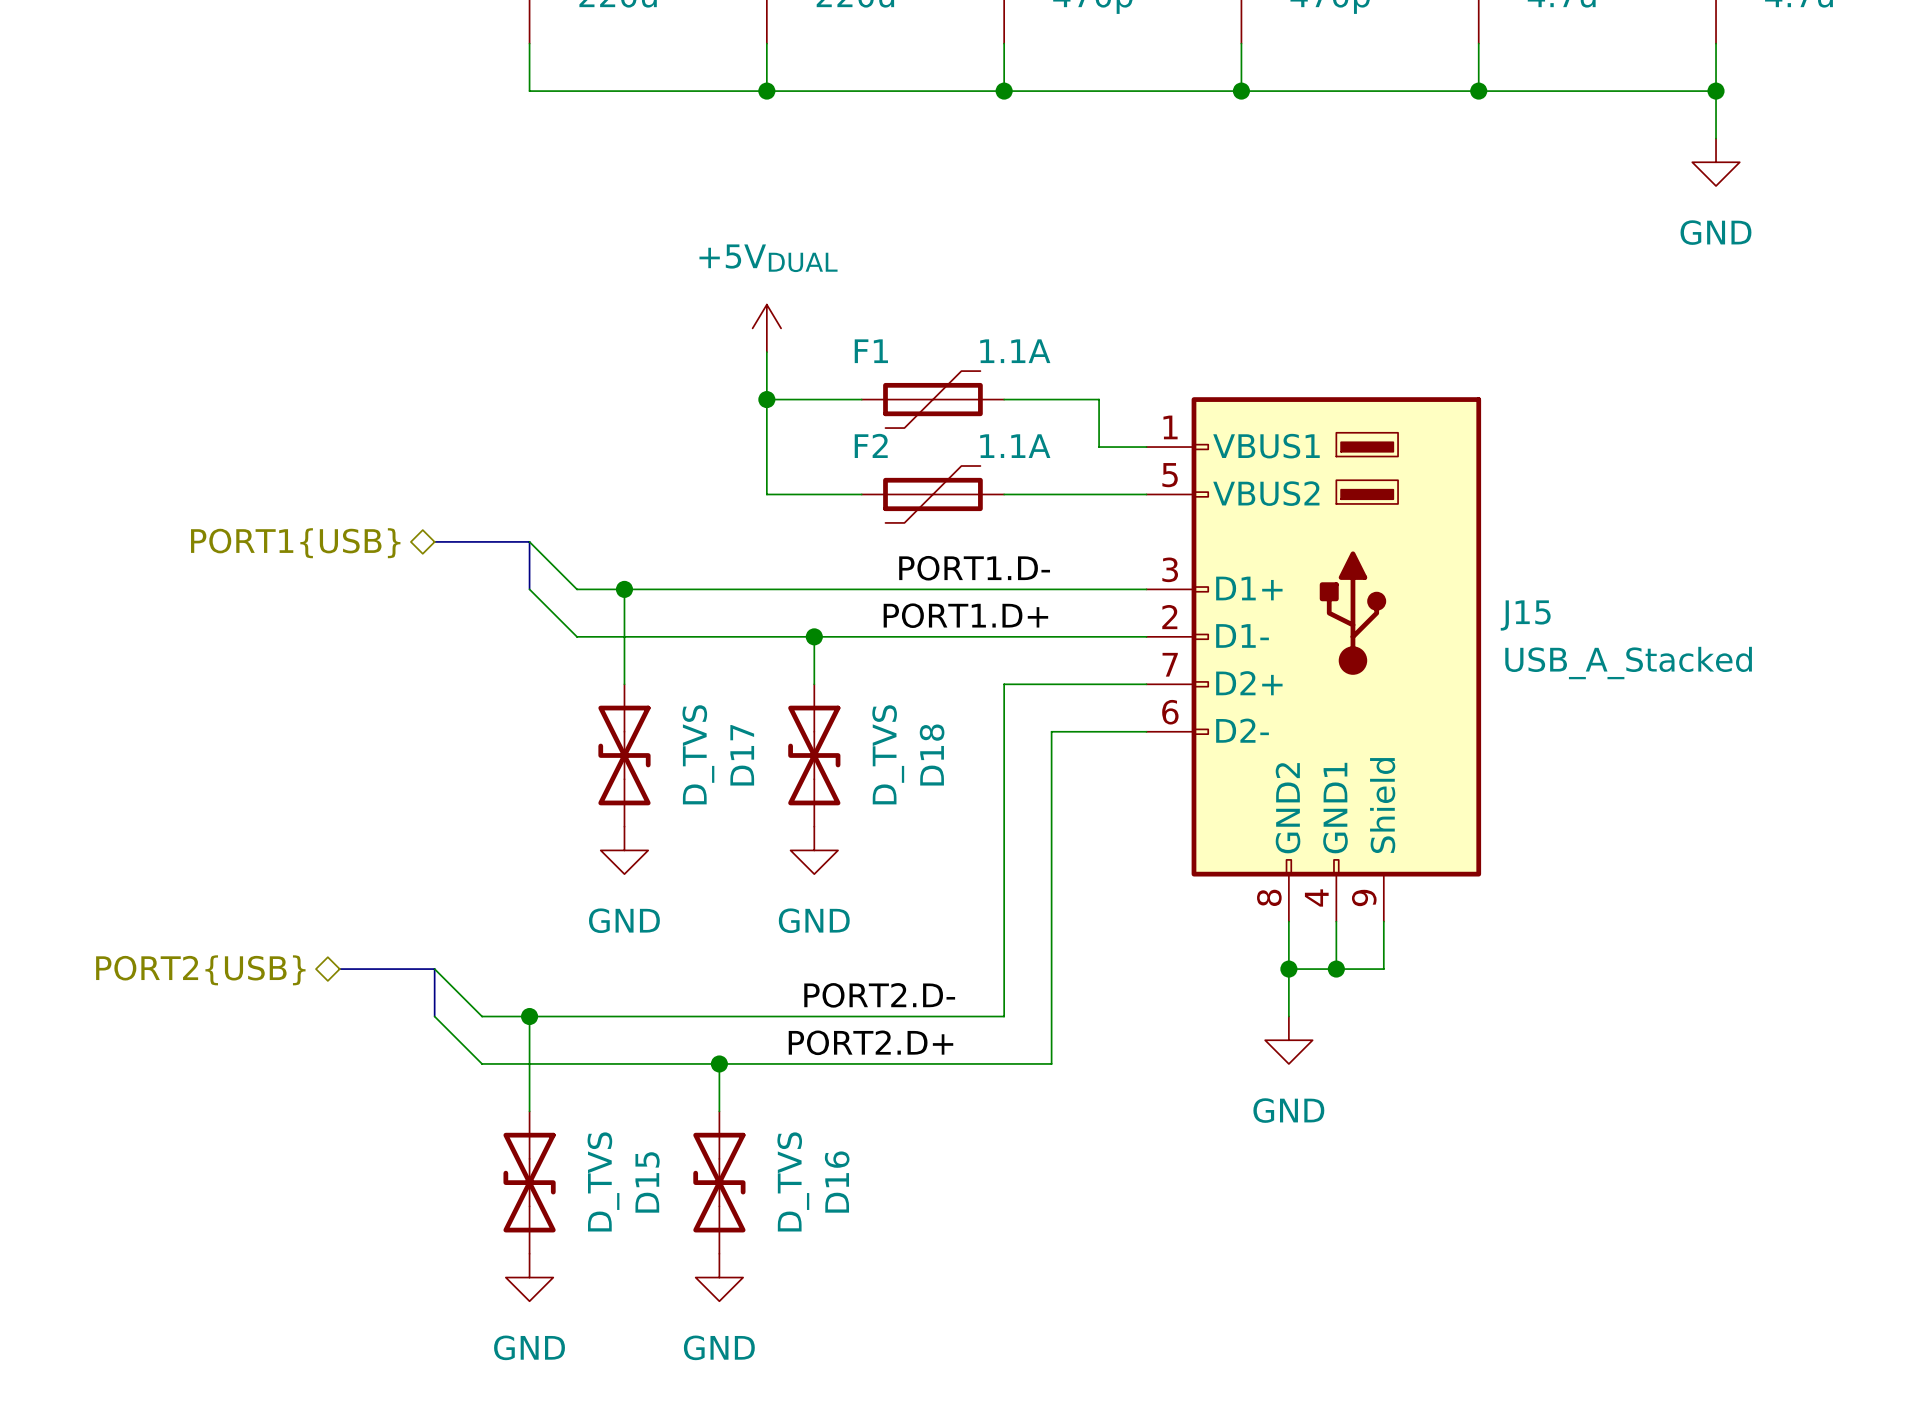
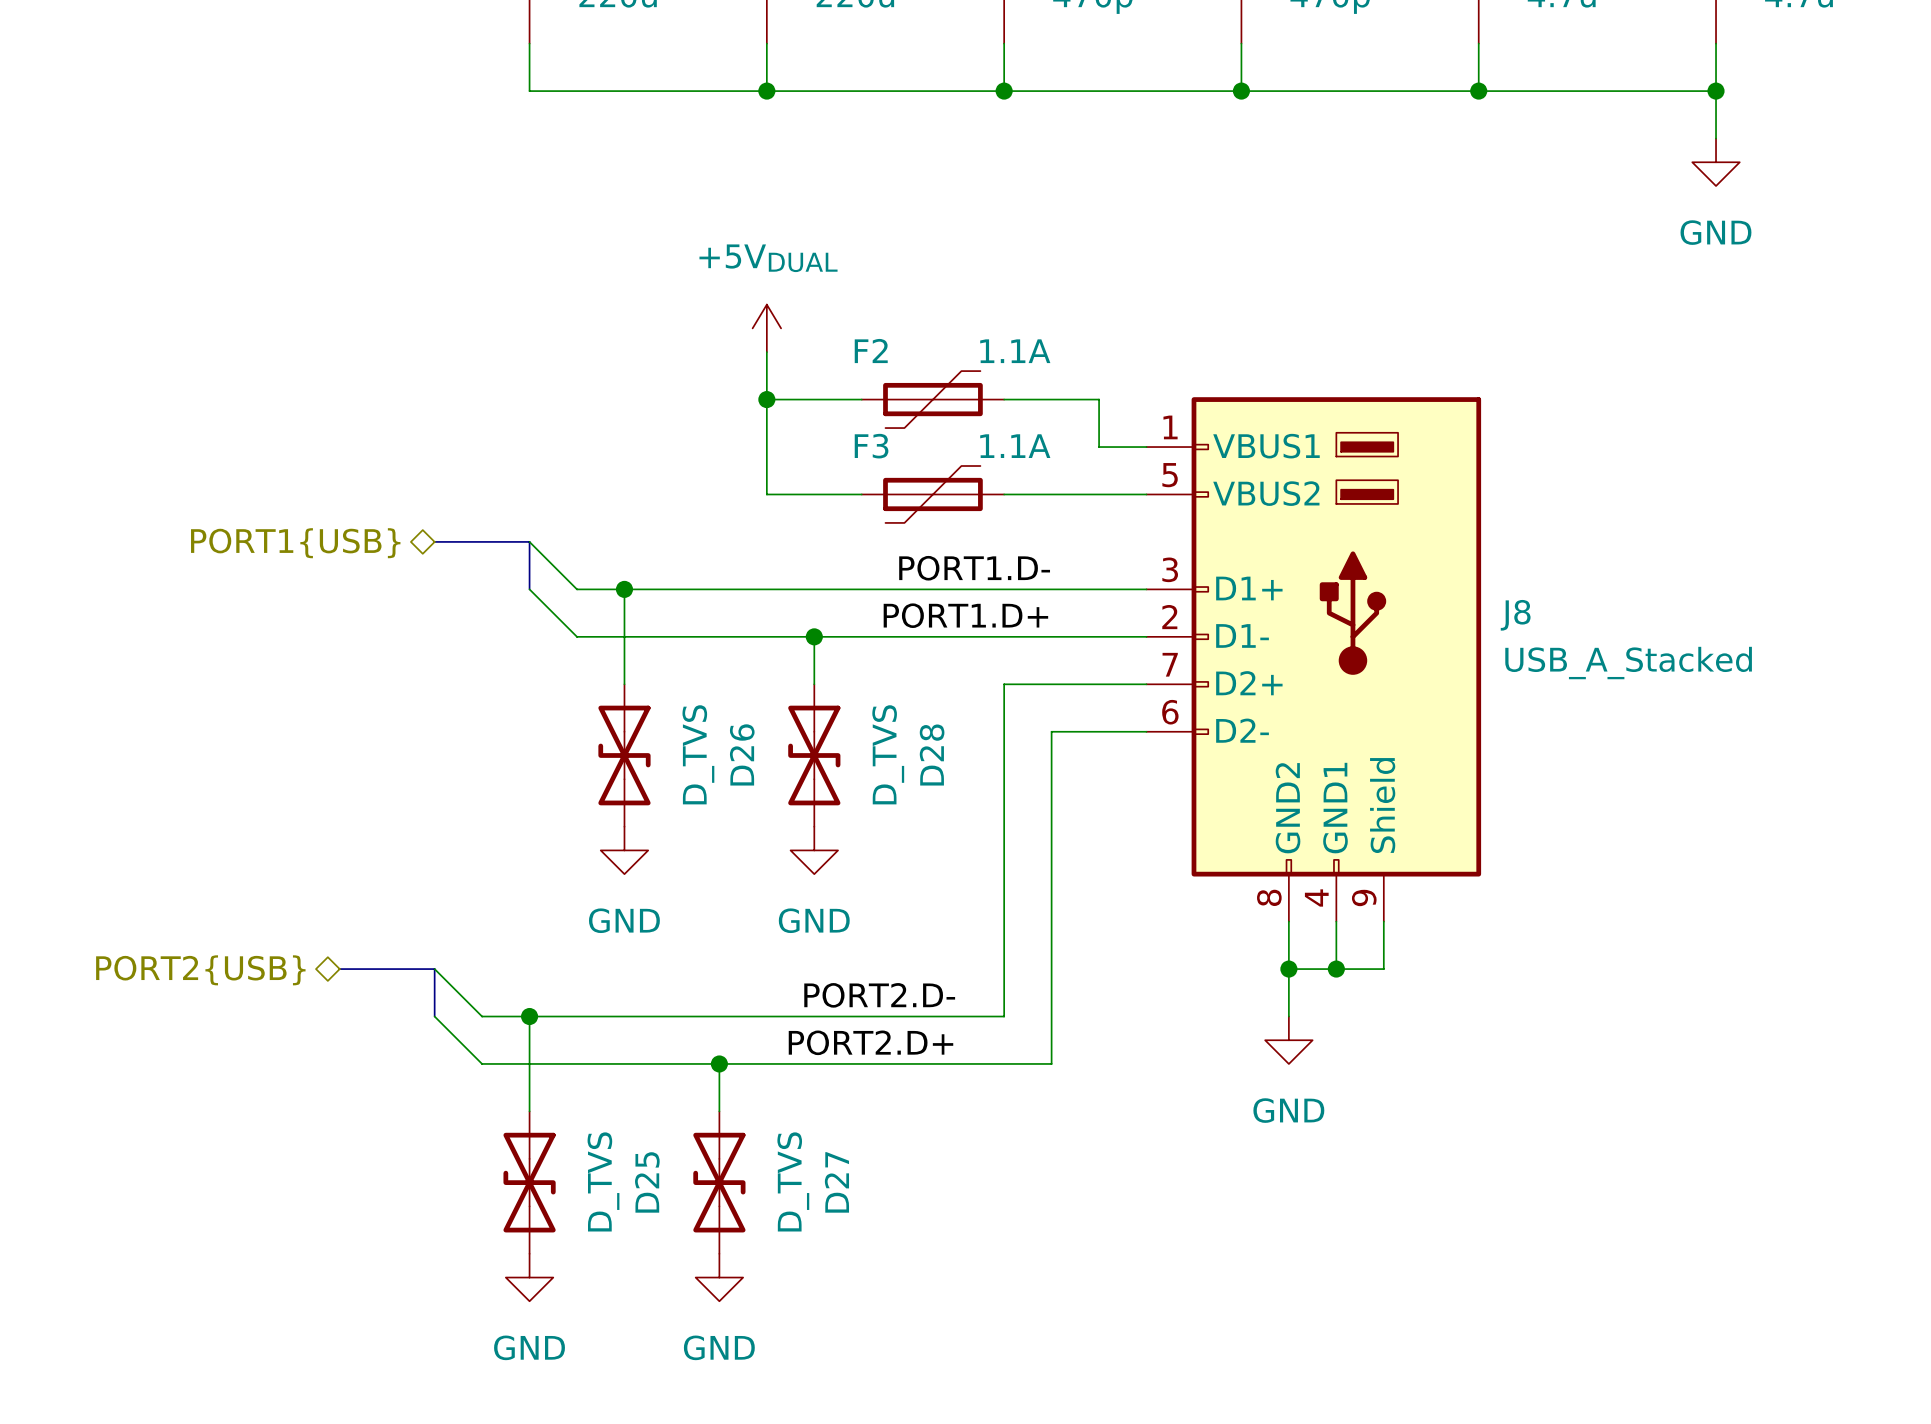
F1 name: F1 (871, 351) -> F2 (871, 351)
F2 name: F2 (871, 445) -> F3 (871, 446)
J15 name: J15 (1525, 615) -> J8 (1515, 615)
D17 name: D17 (742, 755) -> D26 (742, 754)
D18 name: D18 (932, 755) -> D28 (932, 755)
D15 name: D15 (647, 1182) -> D25 (647, 1182)
D16 name: D16 (837, 1182) -> D27 (836, 1182)

